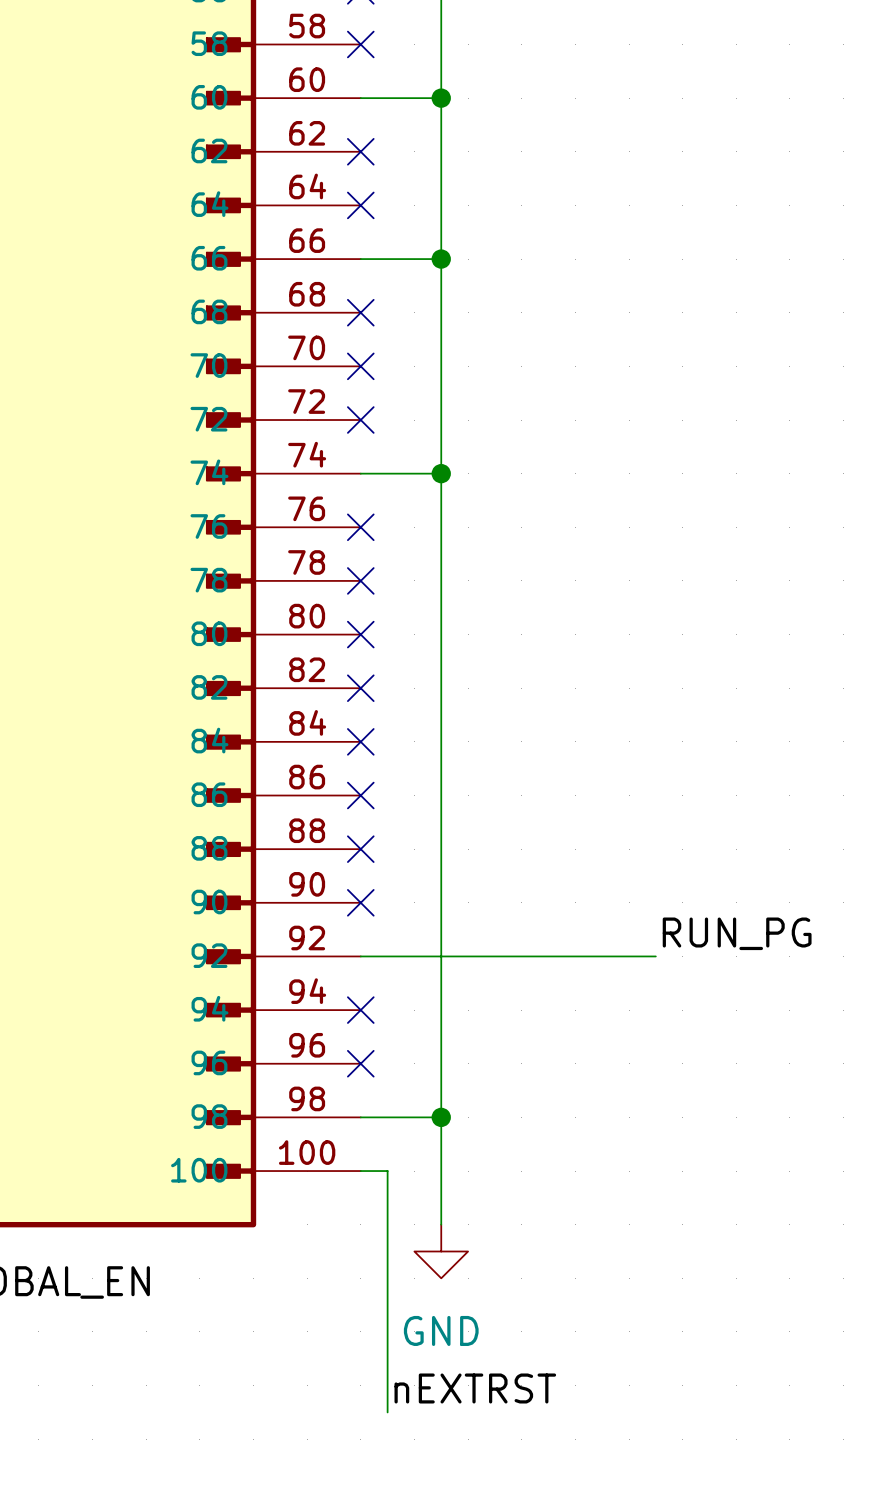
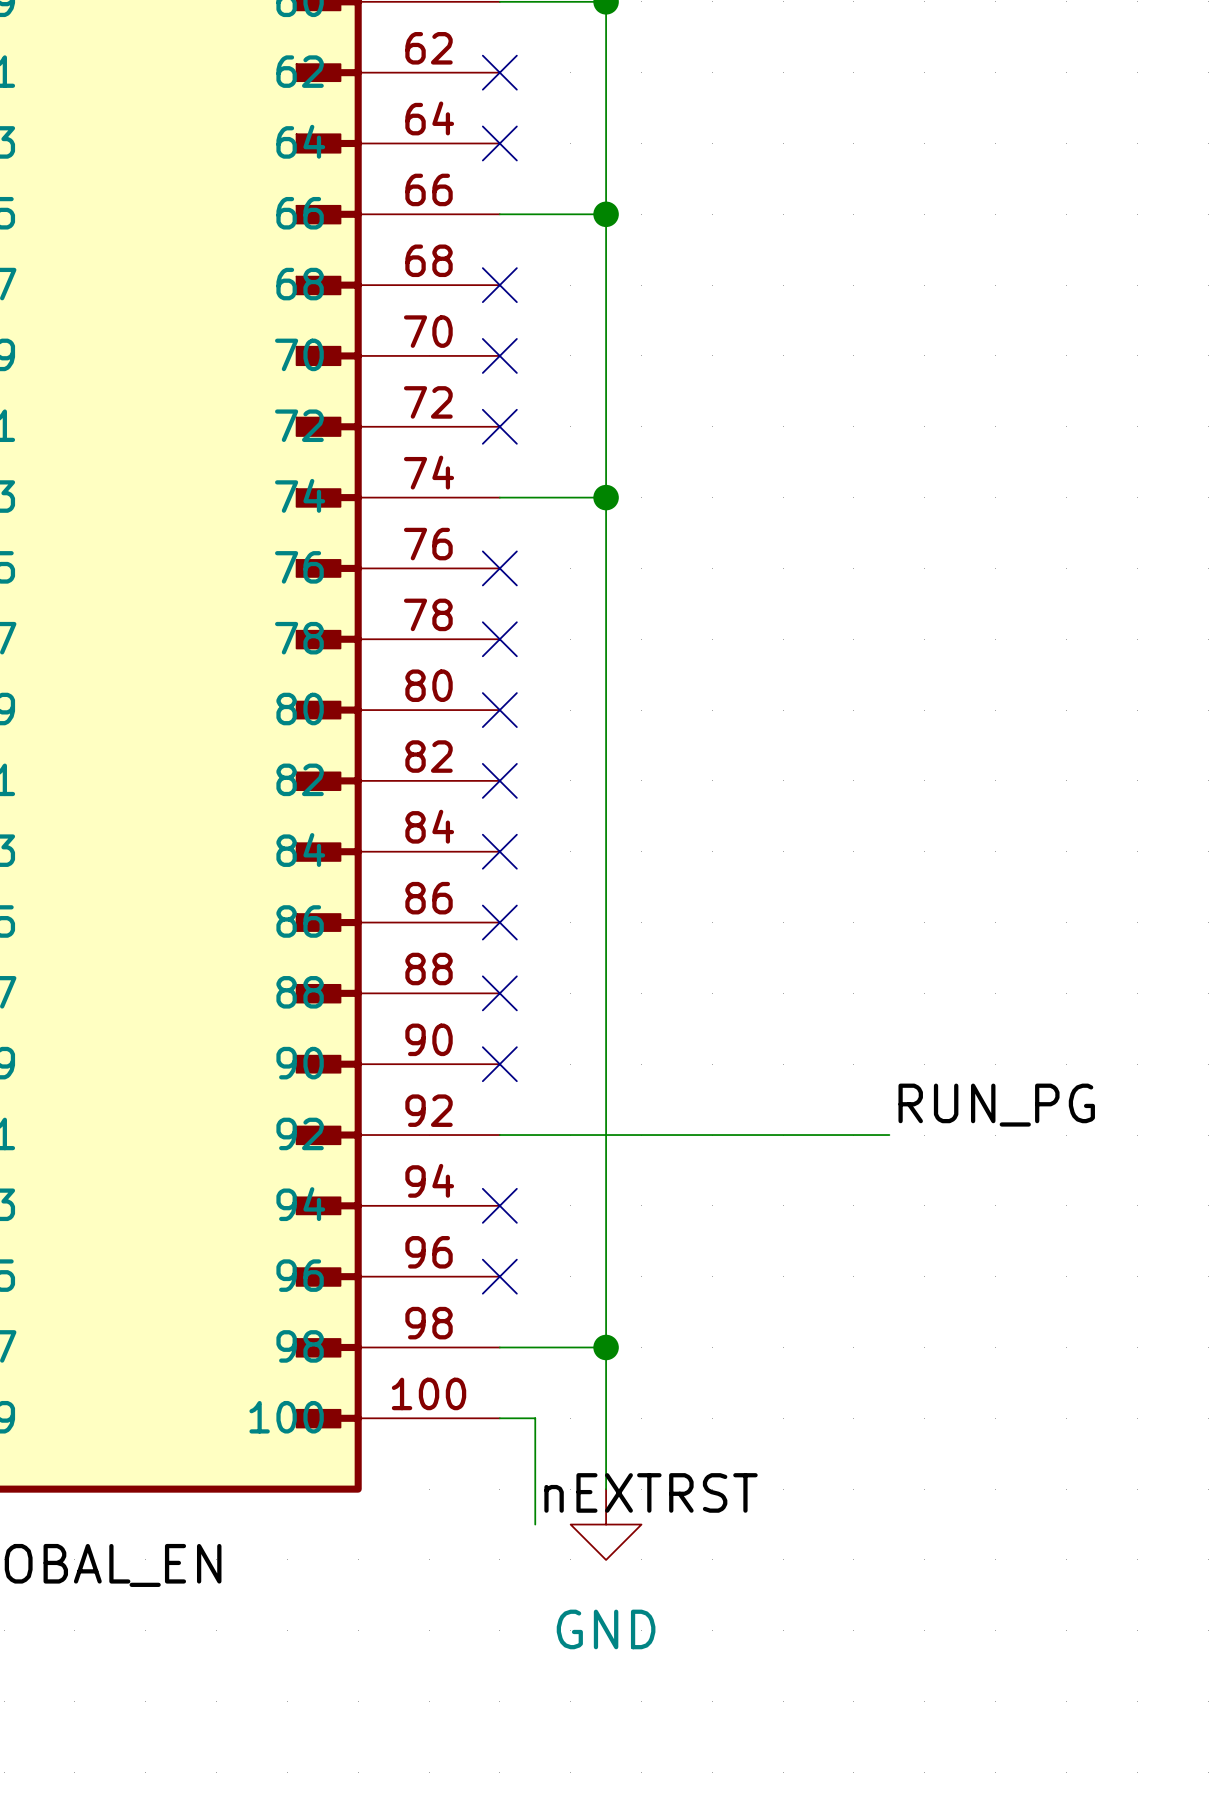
wire: (387, 1251) (387, 1412) -> none
label position: nEXTRST (475, 1388) -> nEXTRST (651, 1492)

